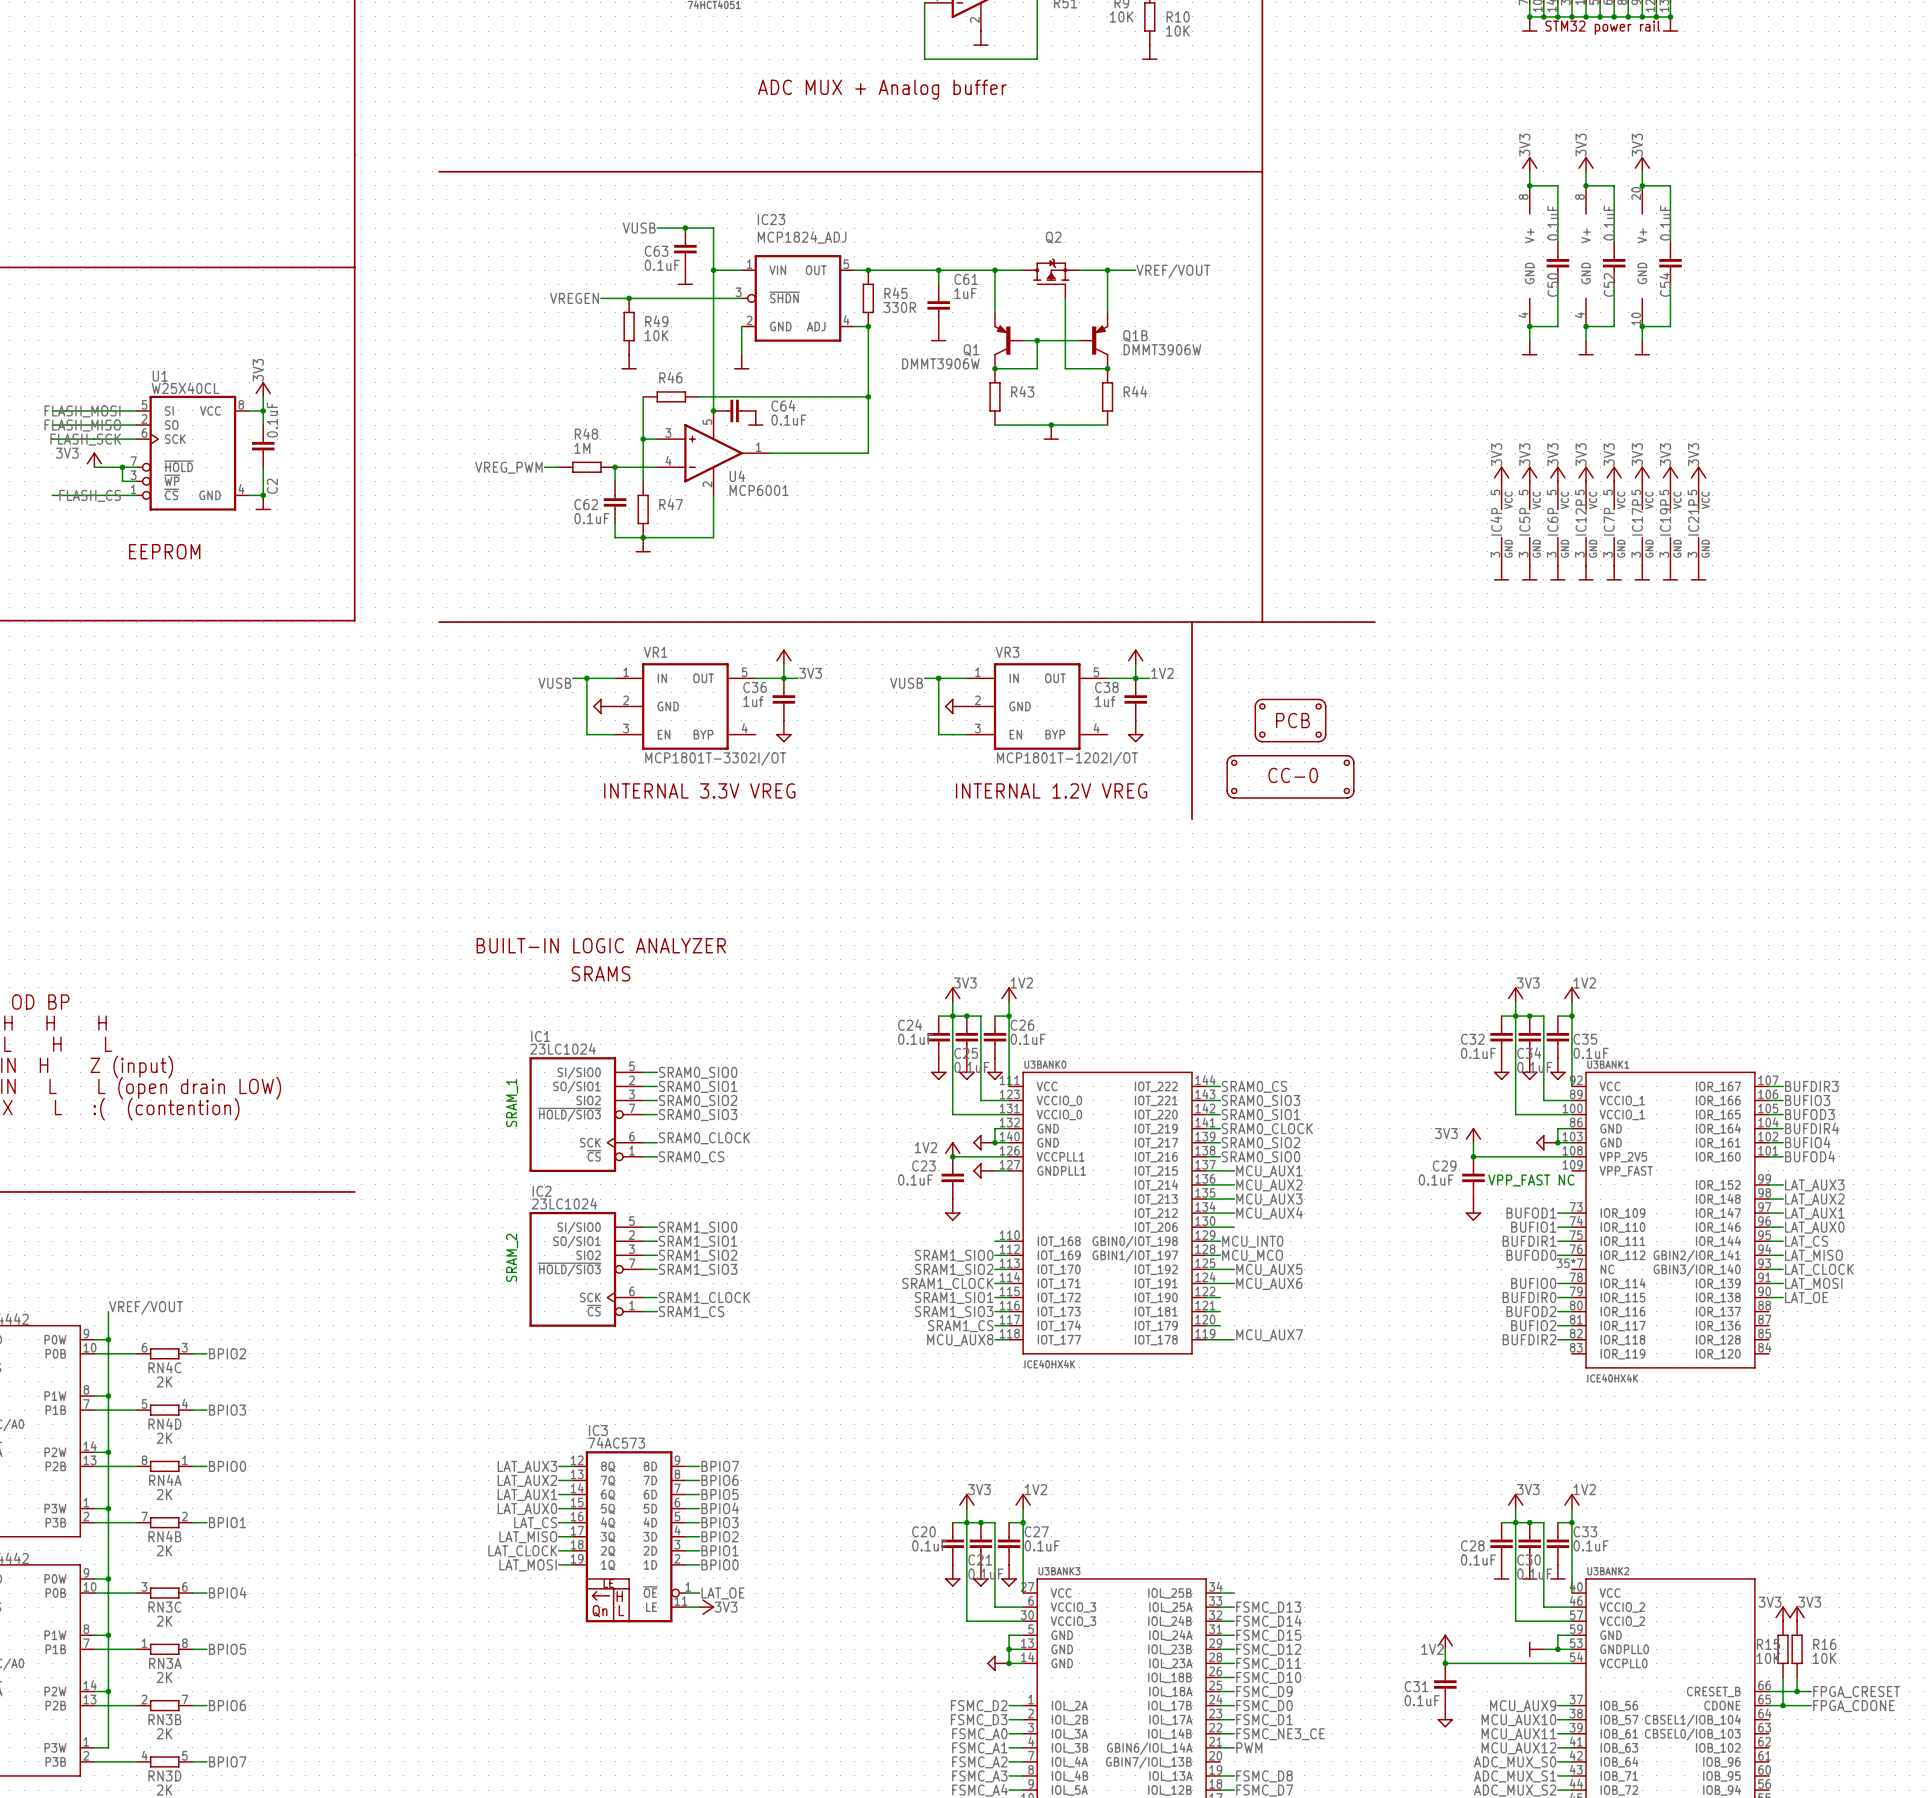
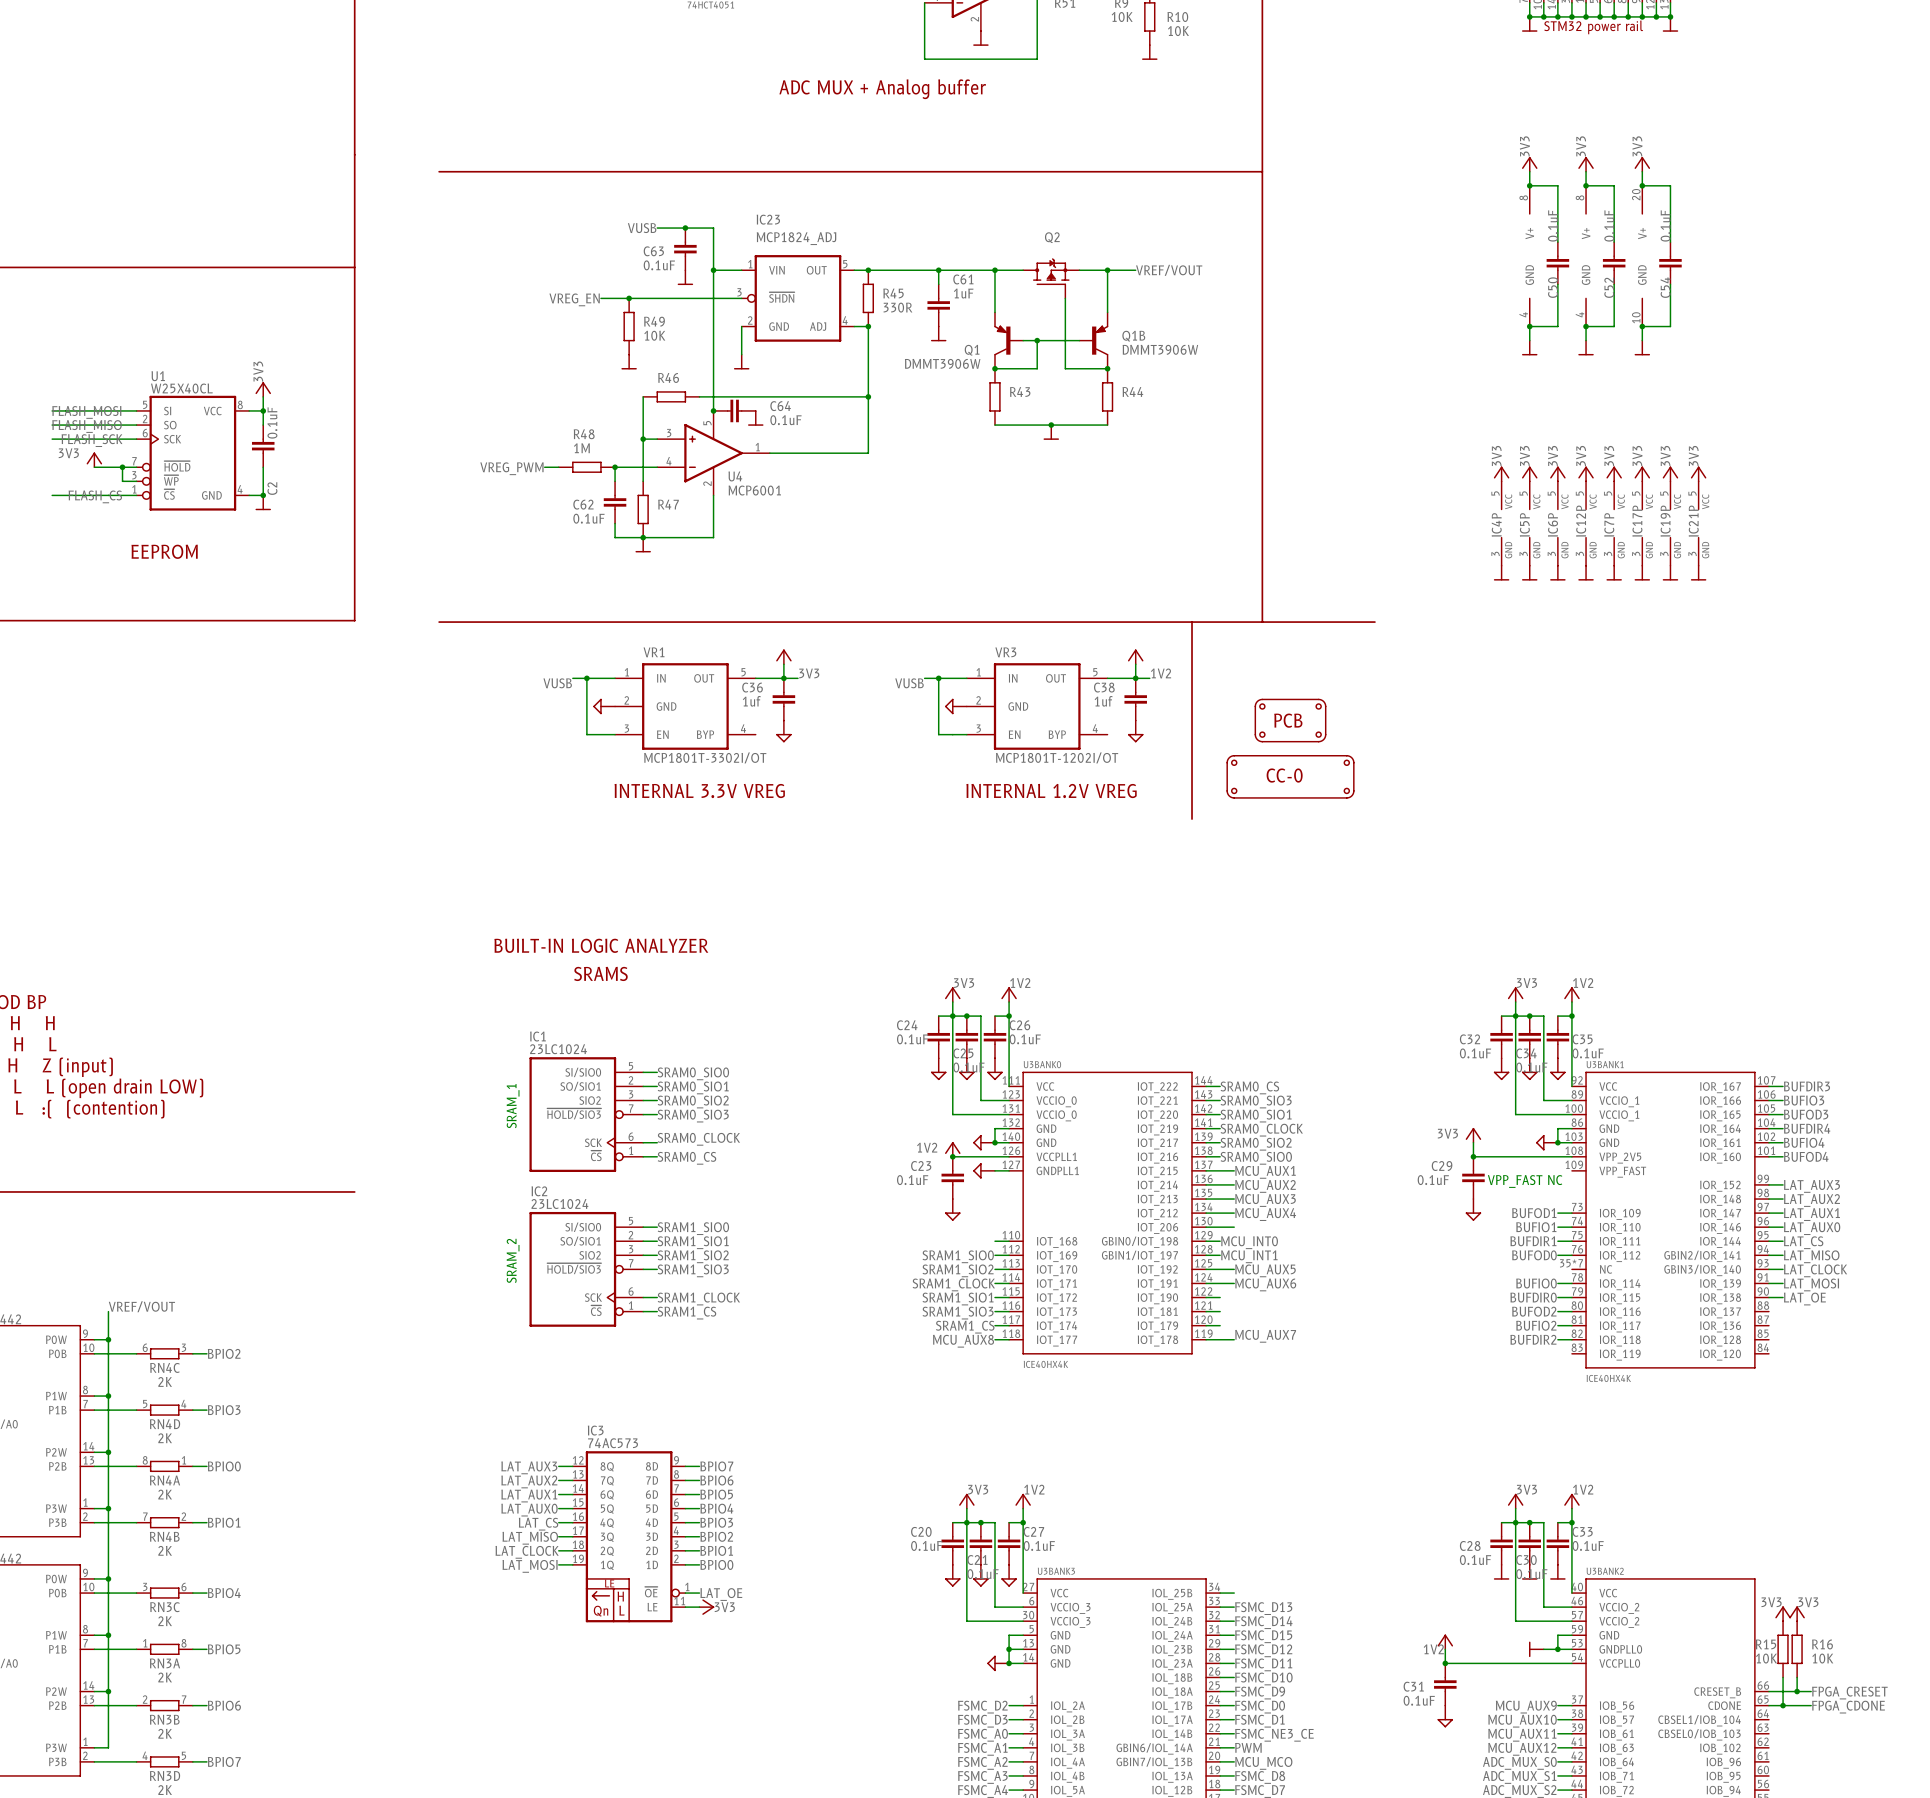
label: VREGEN (574, 298) -> VREG_EN (574, 299)
label: MCU_MCO (1252, 1255) -> MCU_INT1 (1249, 1256)
wire: none -> (1220, 1761) (1234, 1761)
label: none -> MCU_MCO (1263, 1763)

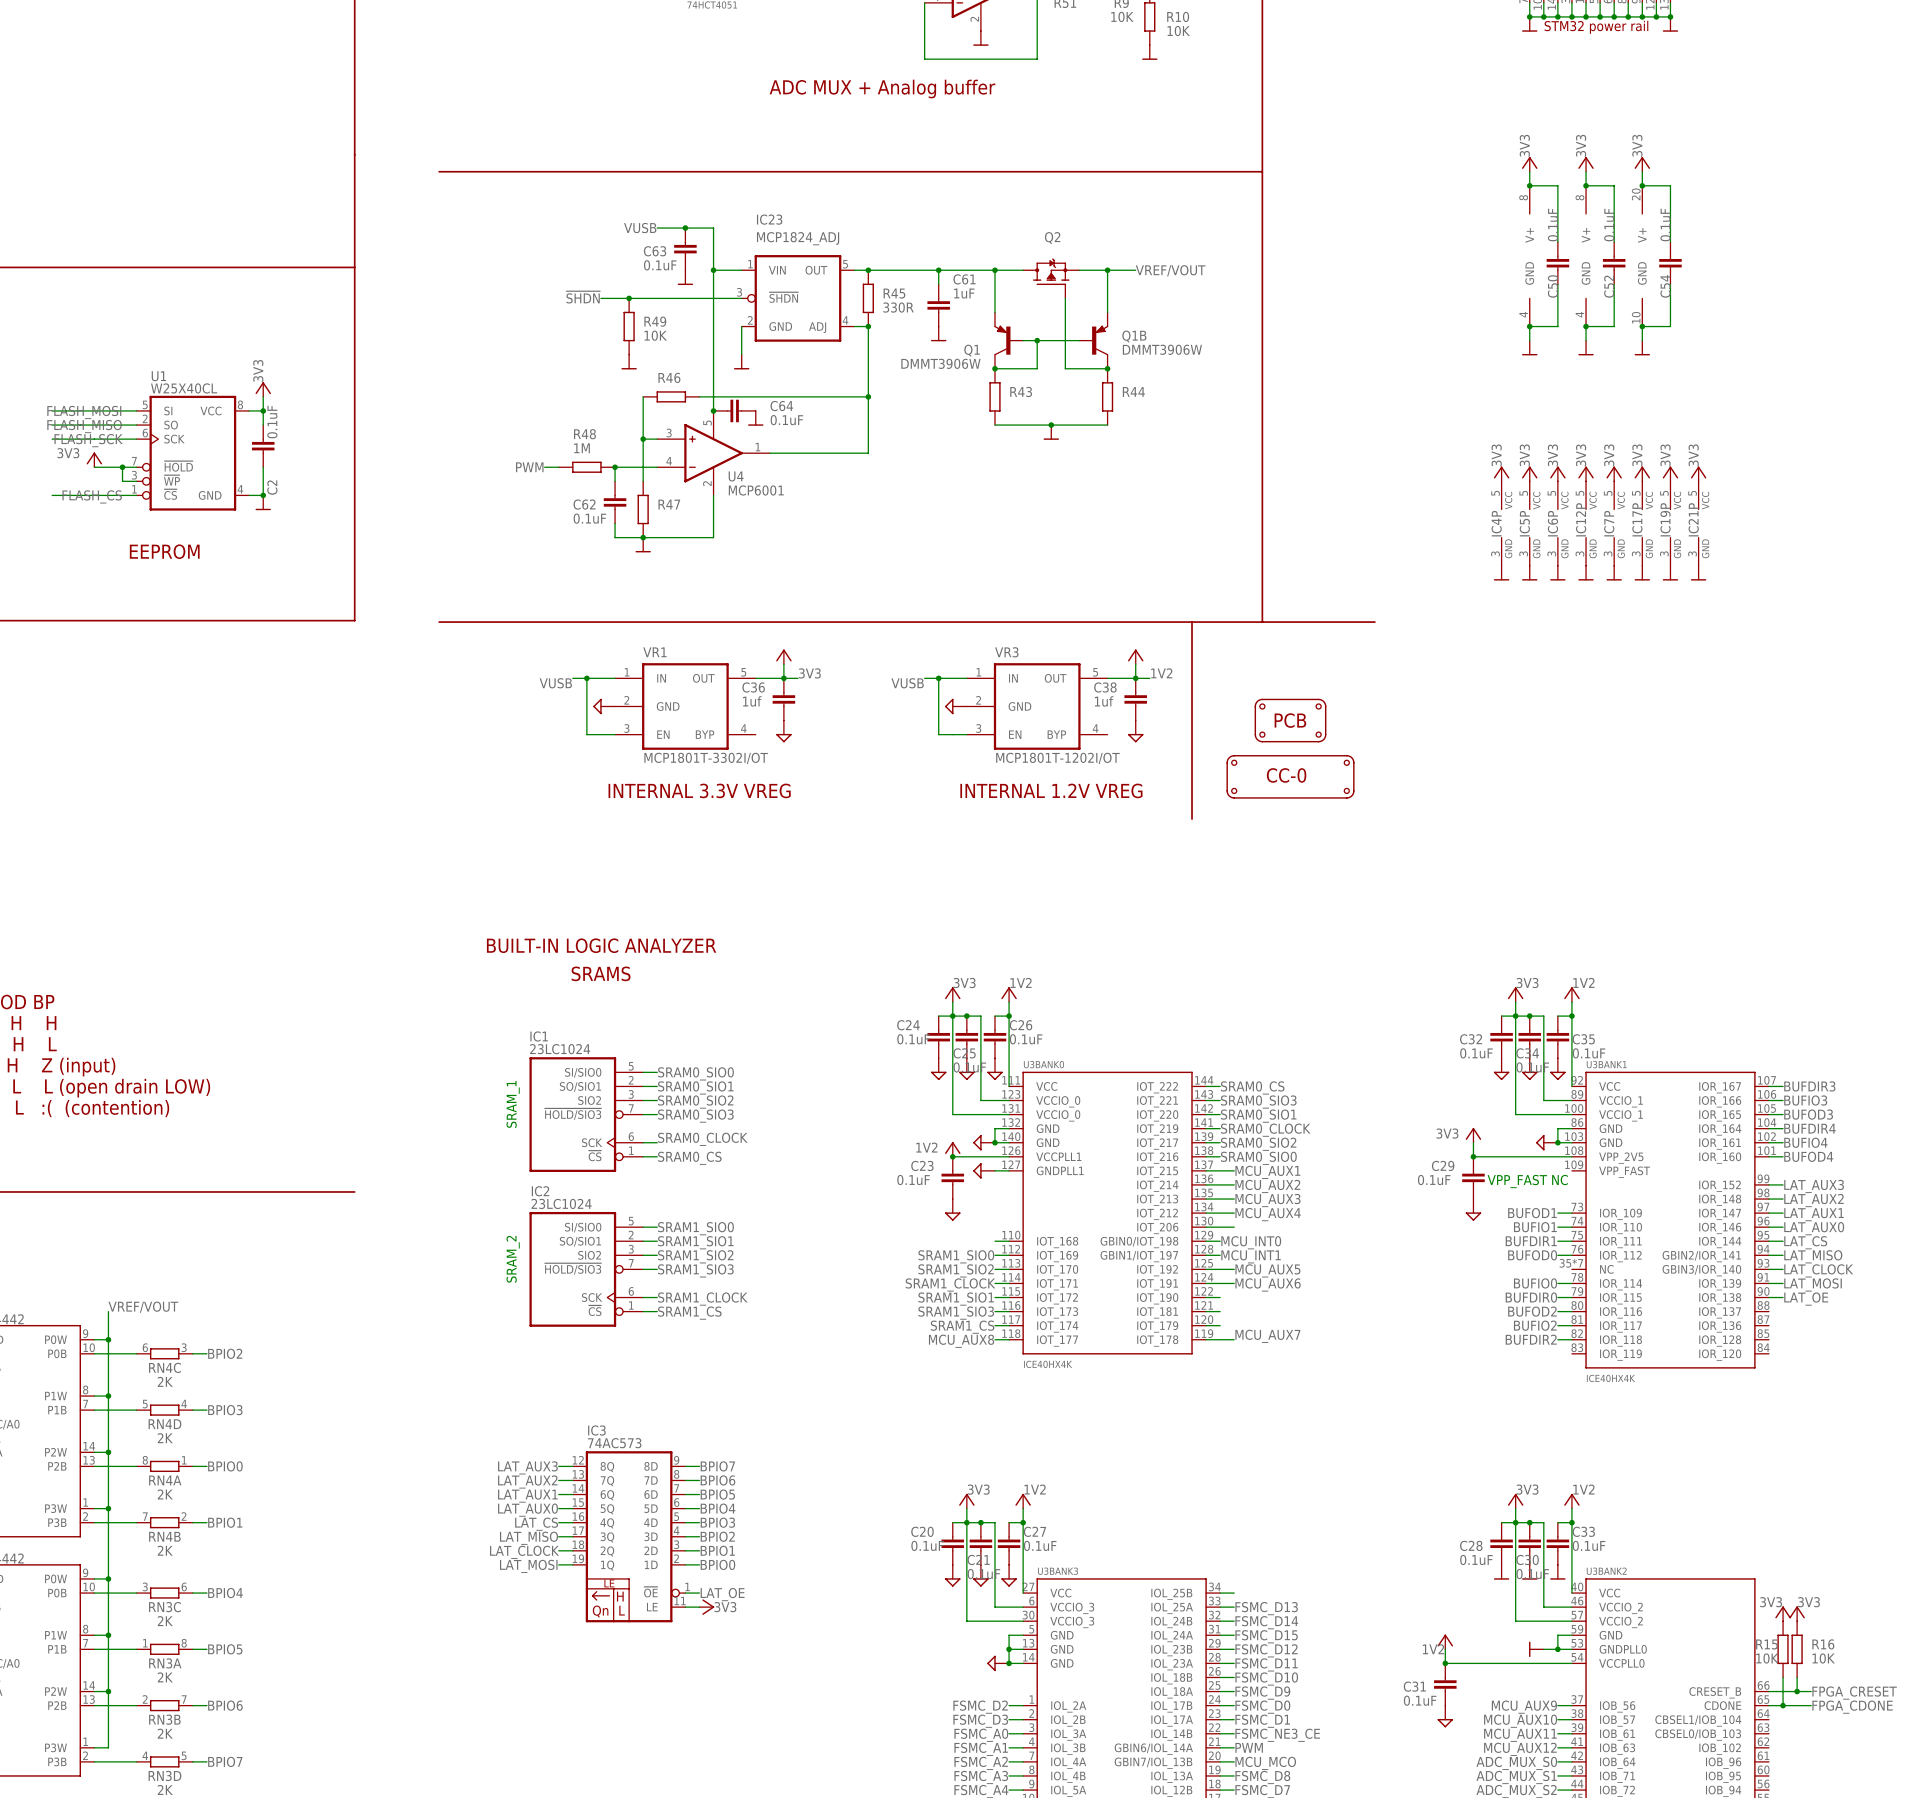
label: VREG_EN (574, 299) -> ~{SHDN} (583, 297)
label: VREG_PWM (511, 468) -> PWM (529, 467)

